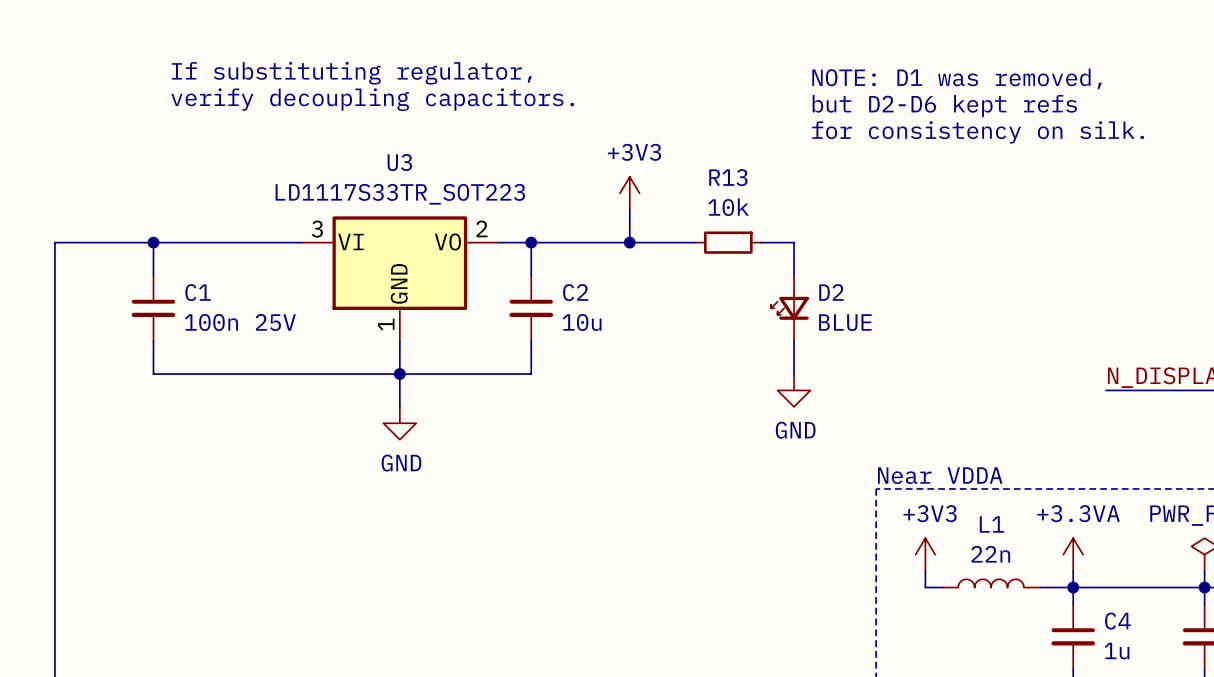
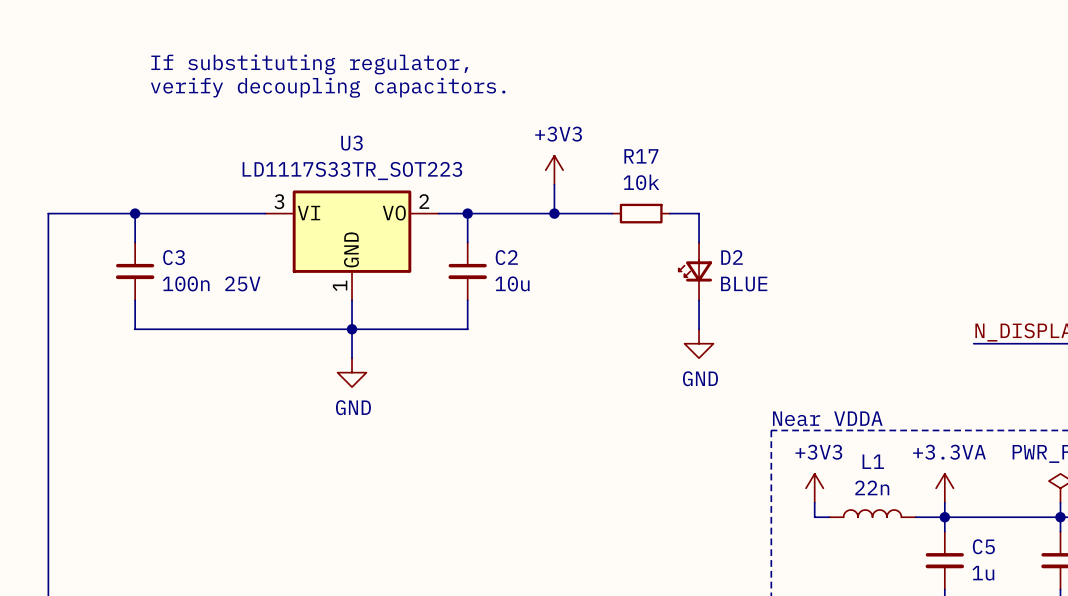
text: NOTE: D1 was removed, (957, 78) -> none
text: but D2-D6 kept refs (944, 106) -> none
text: for consistency on silk. (978, 132) -> none
R13 name: R13 (728, 177) -> R17 (641, 156)
C1 name: C1 (198, 292) -> C3 (174, 257)
C4 name: C4 (1117, 621) -> C5 (983, 546)

